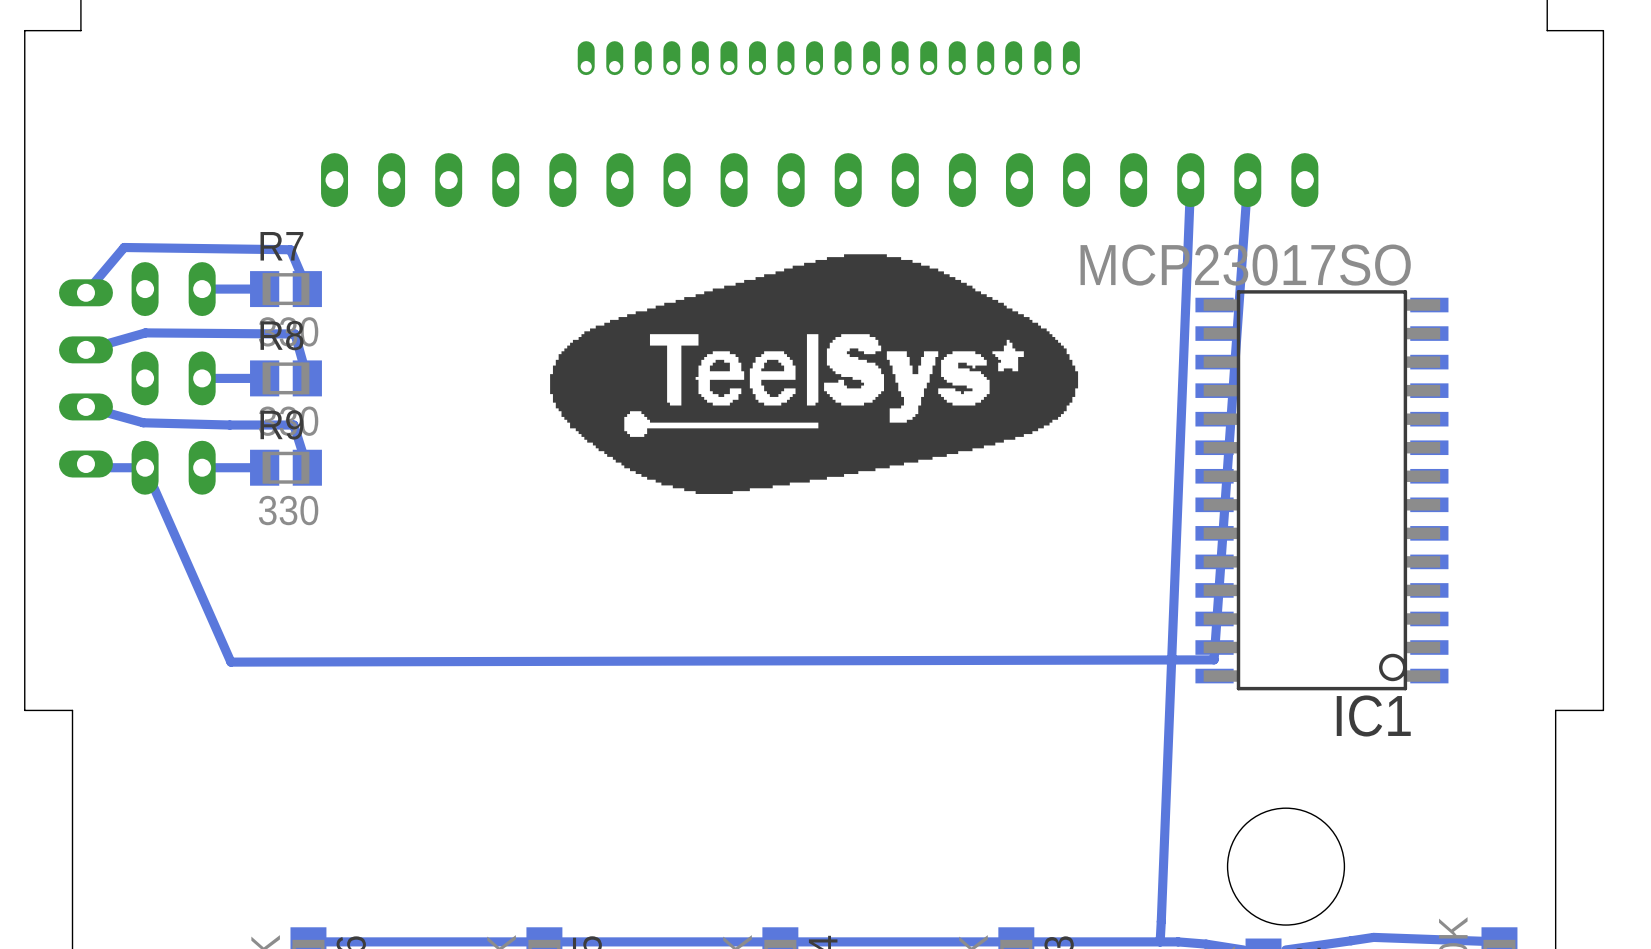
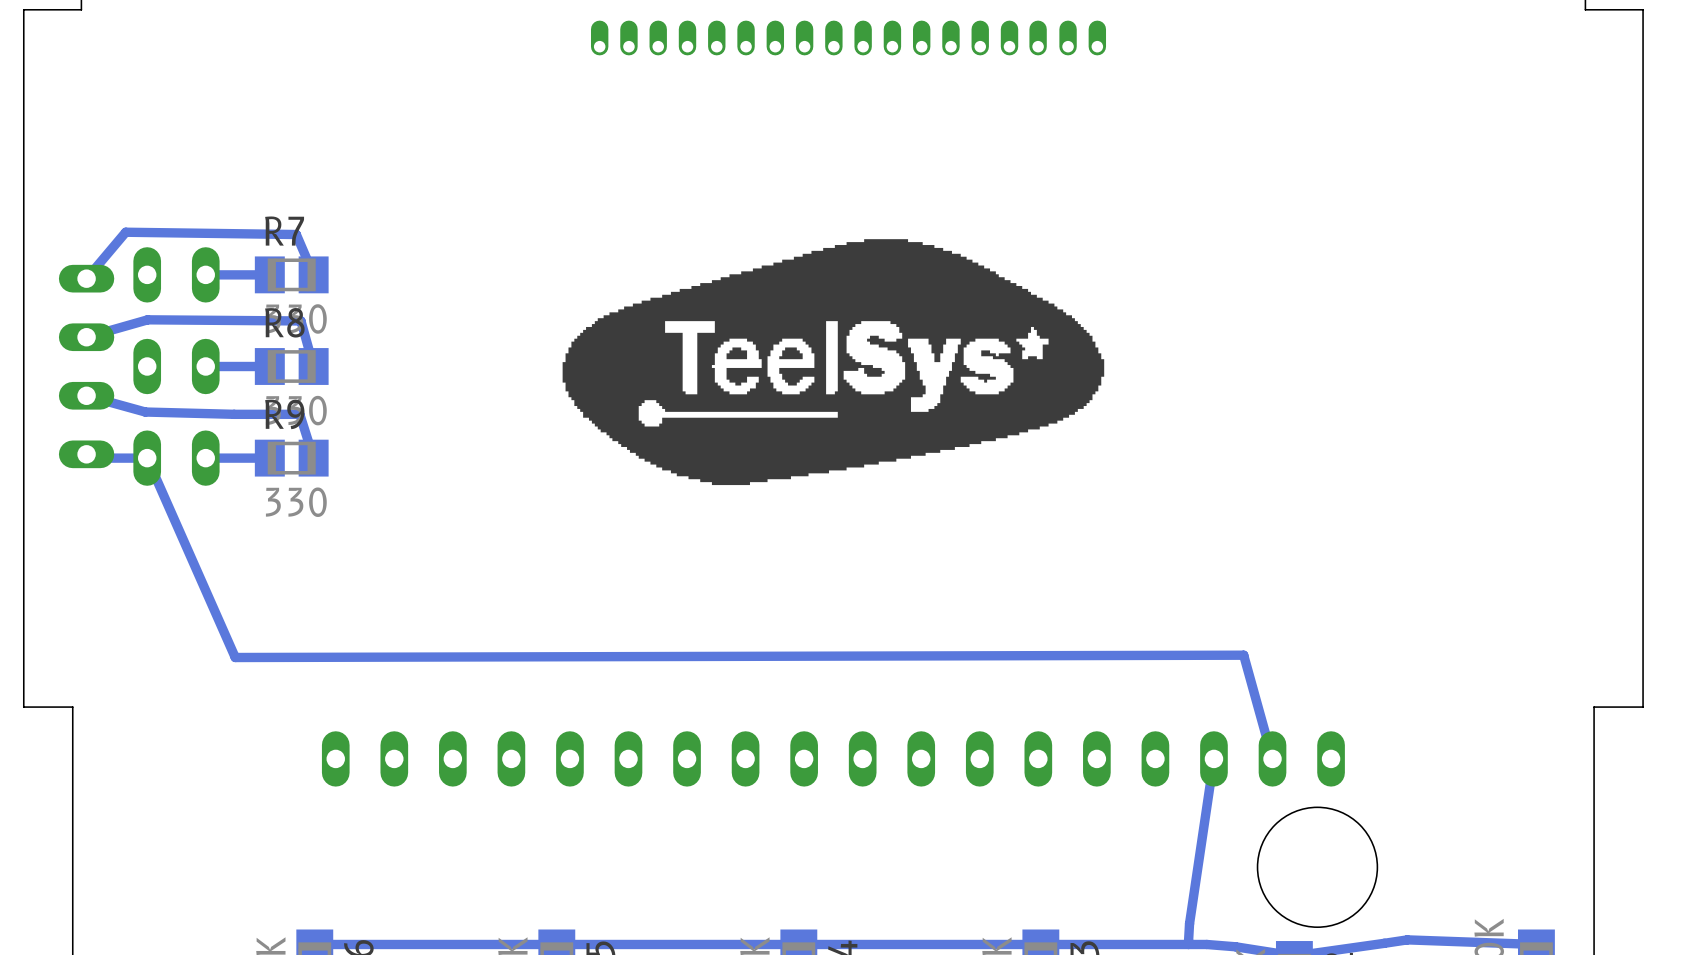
part: (819, 180) -> none
track: (1190, 180) (1161, 921) -> (1213, 758) (1189, 923)
track: (1247, 180) (1214, 659) -> (1272, 758) (1243, 655)
IC1: MCP23017SO (1321, 490) -> none
part: none -> (833, 758)

